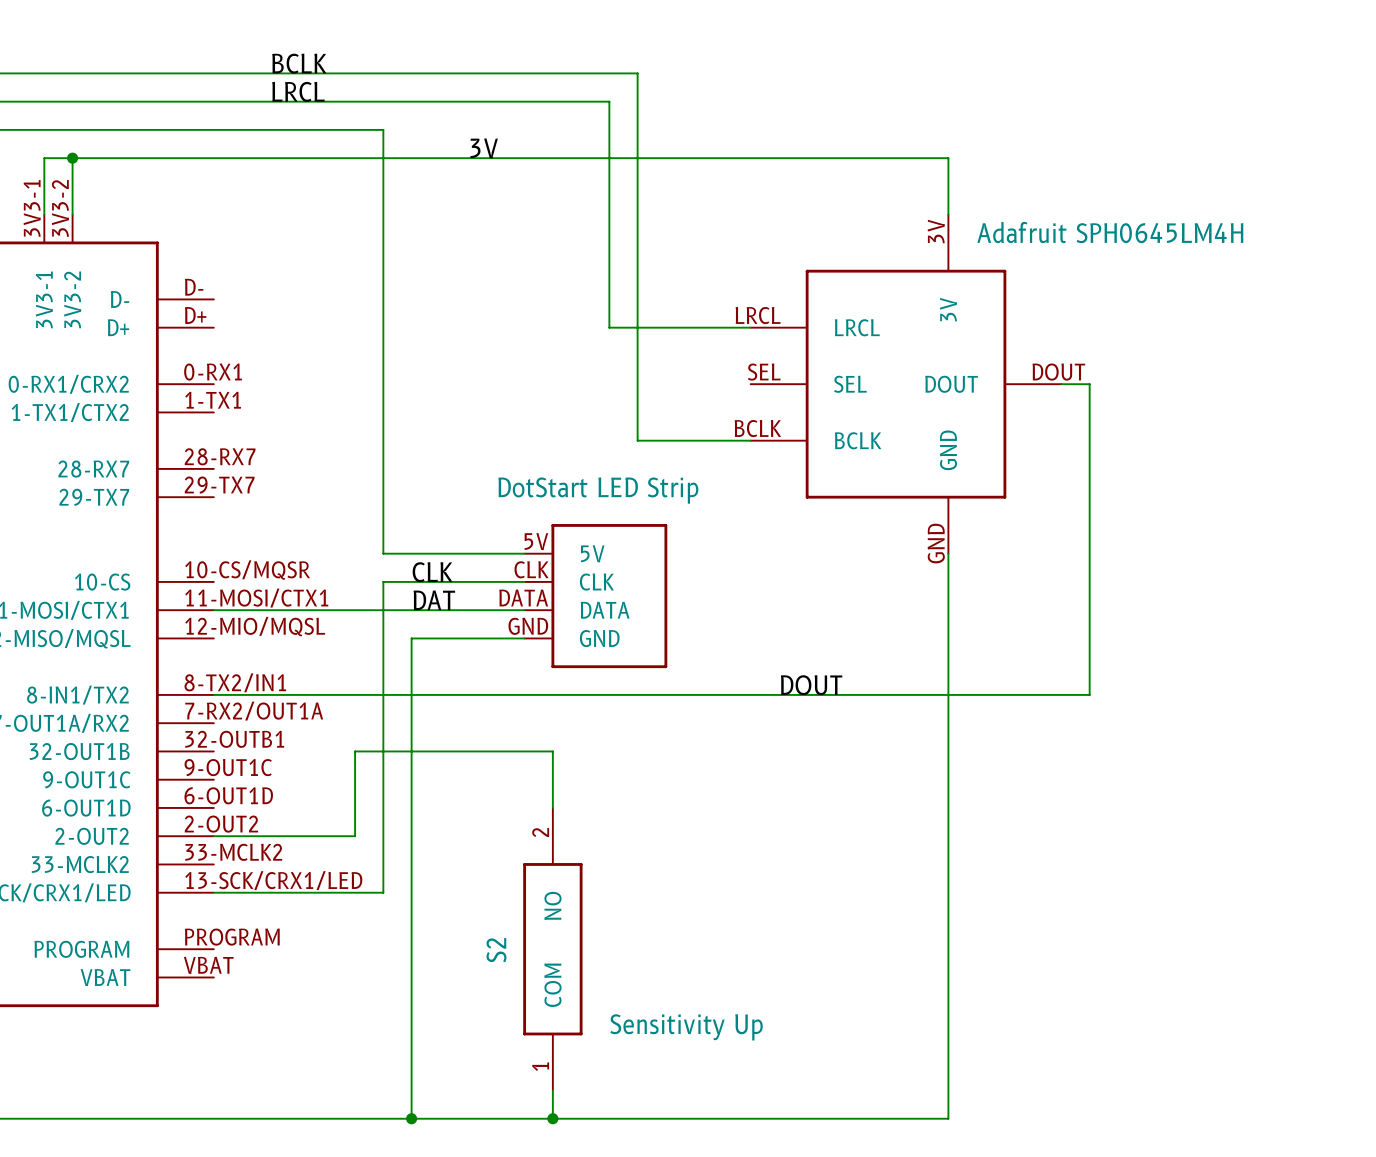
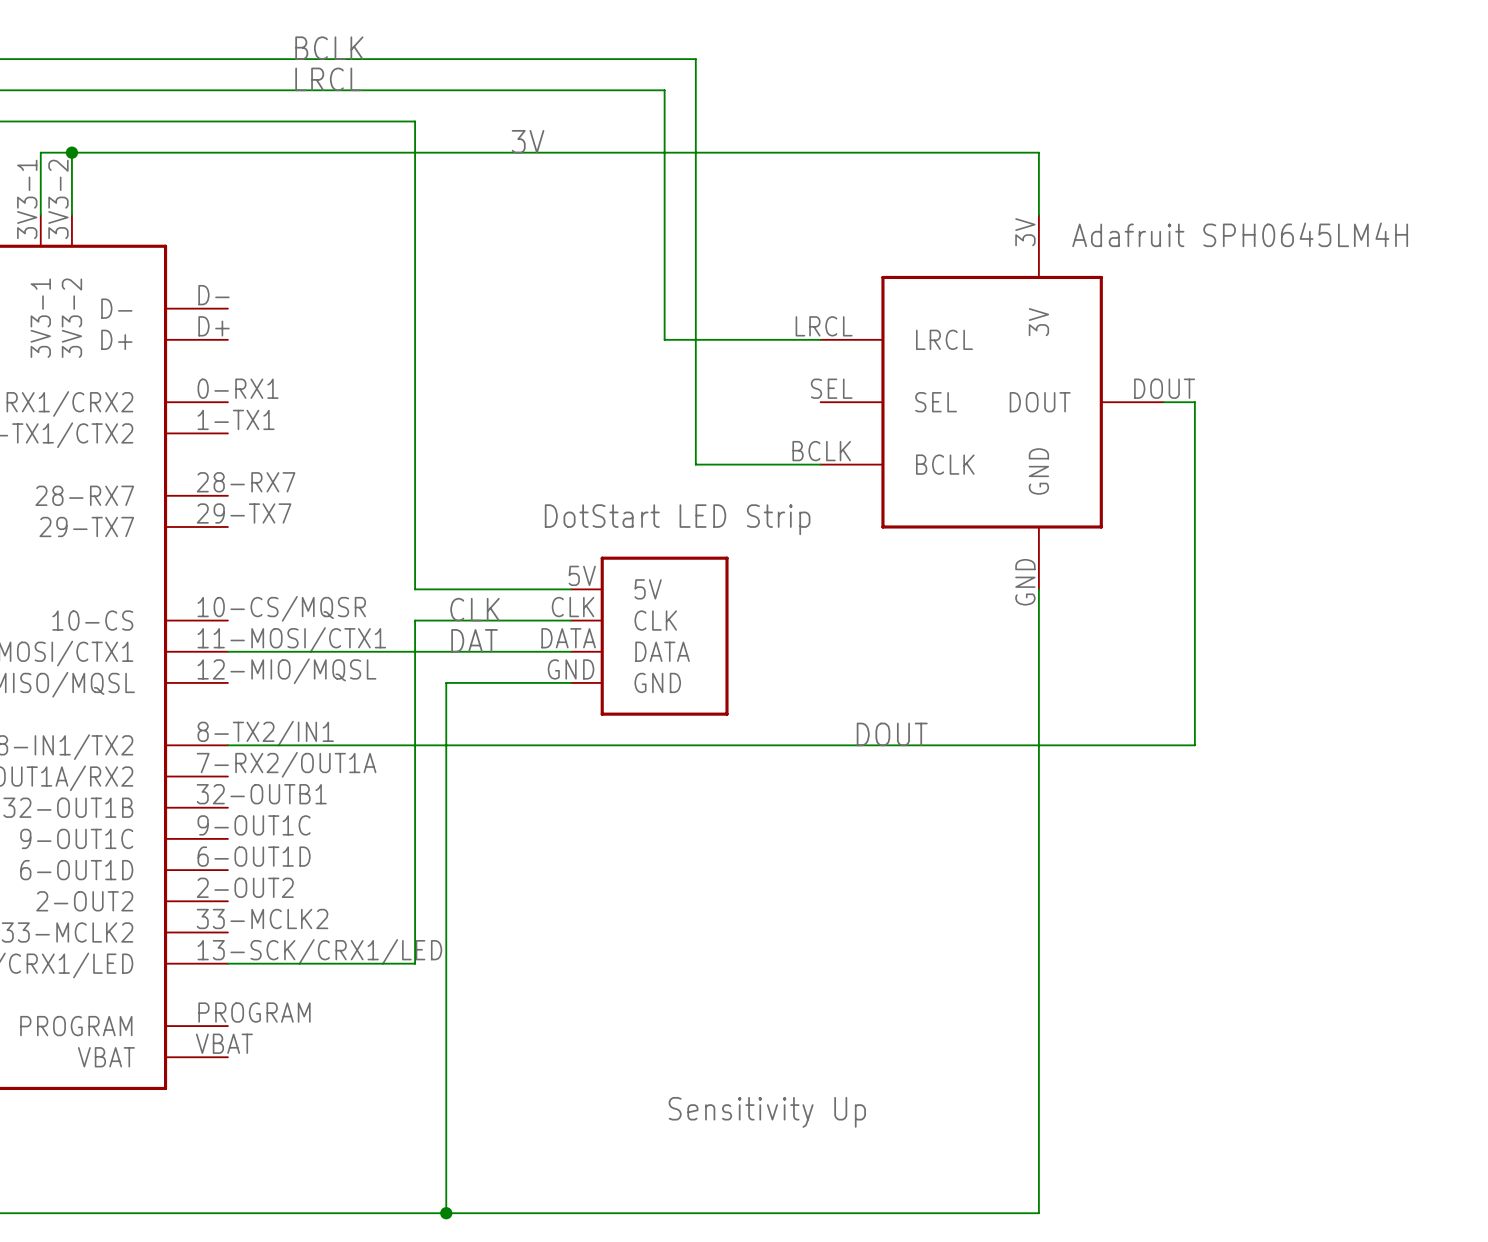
wire: (552, 807) (552, 751) (355, 751) (355, 836) (213, 836) -> none
S2: (552, 949) -> none
wire: (552, 1090) (552, 1118) -> none
junction: (552, 1118) -> none

